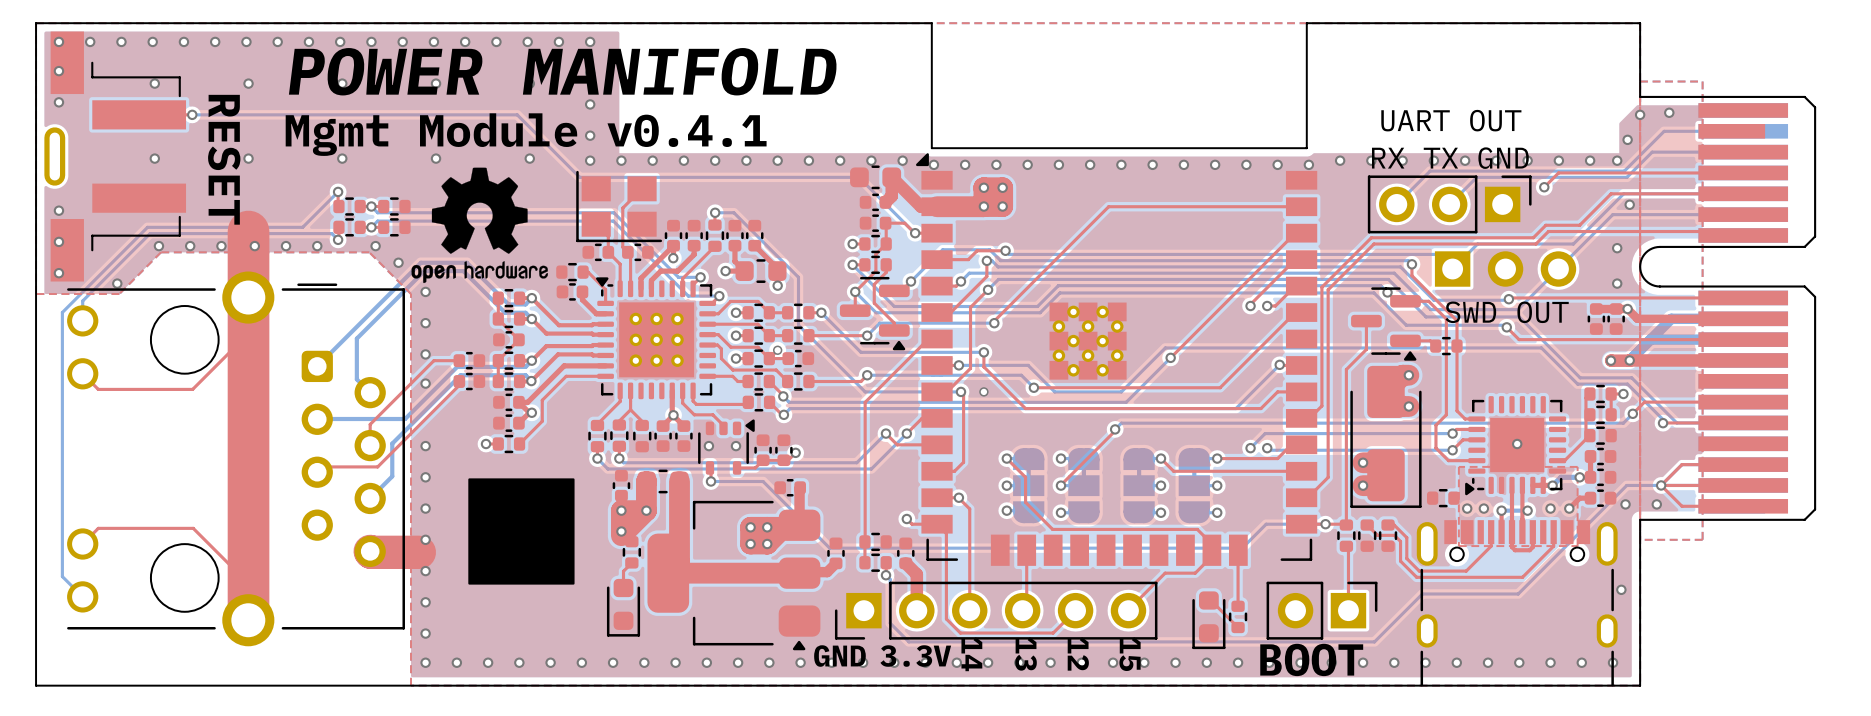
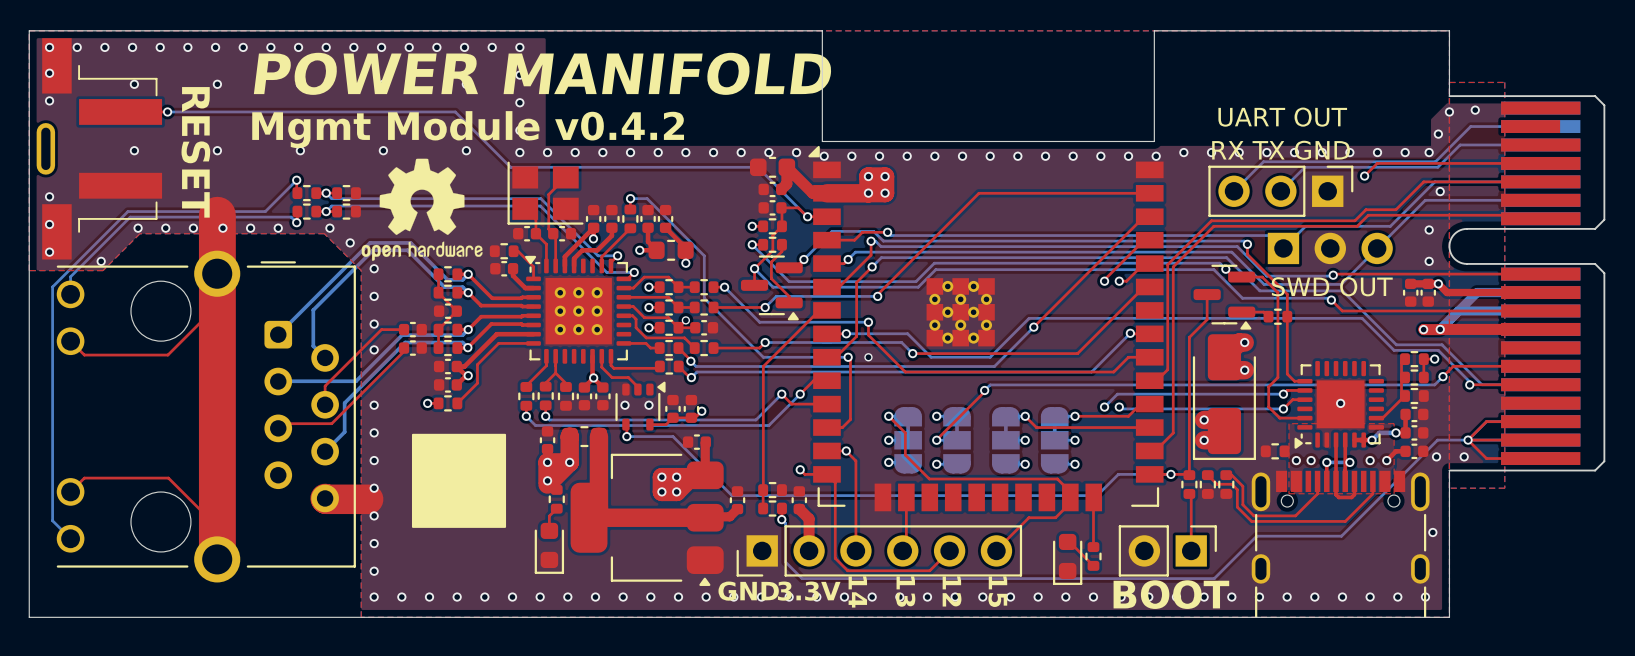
text: Mgmt Module v0.4.1 (526, 134) -> Mgmt Module v0.4.2 (468, 129)

